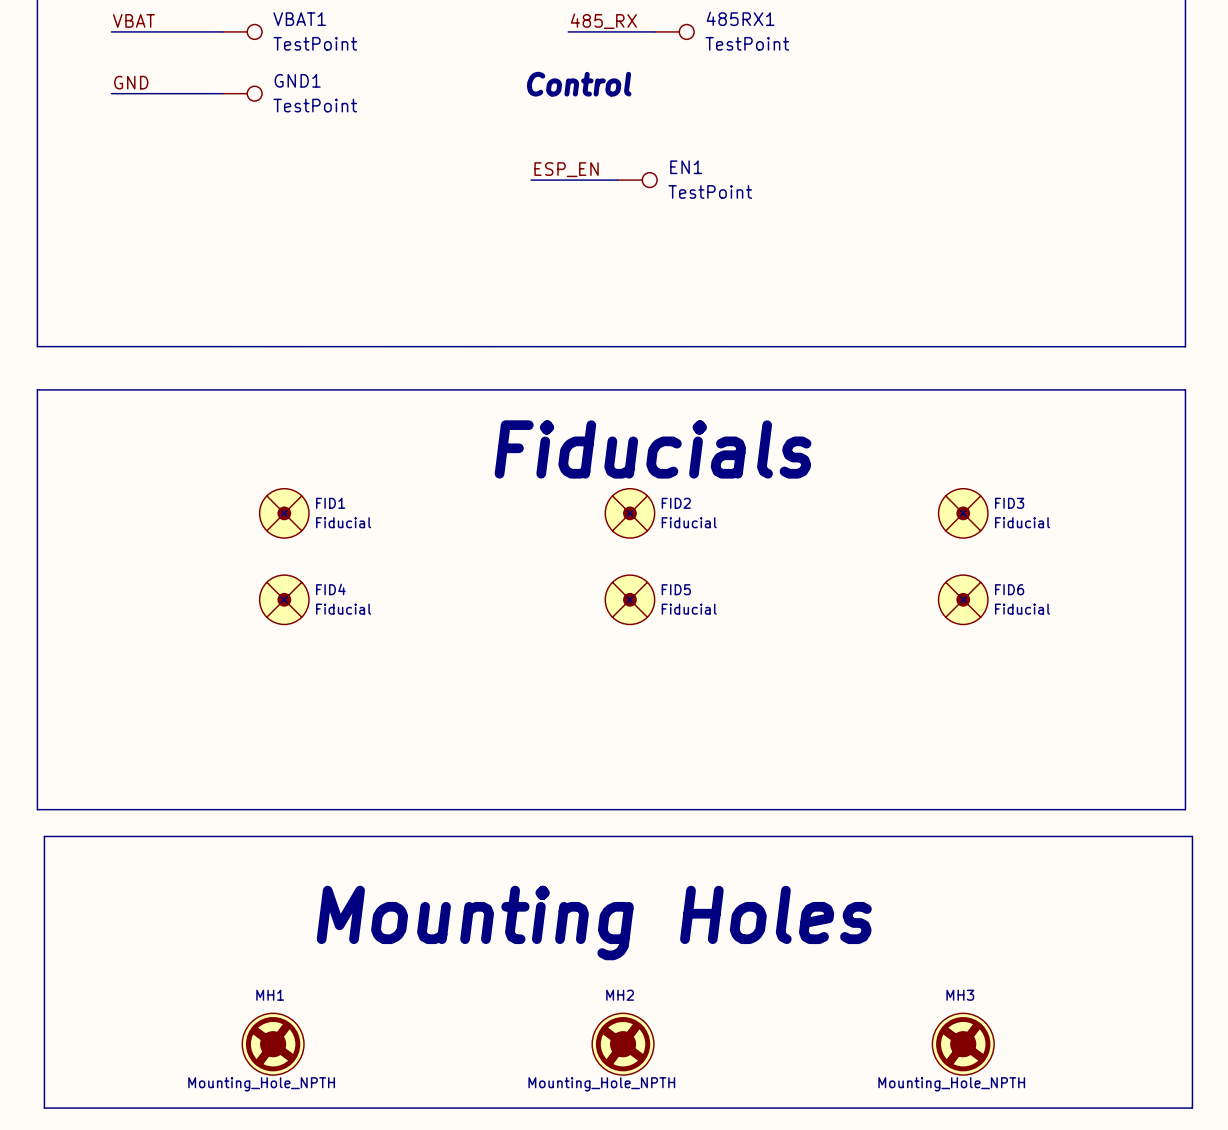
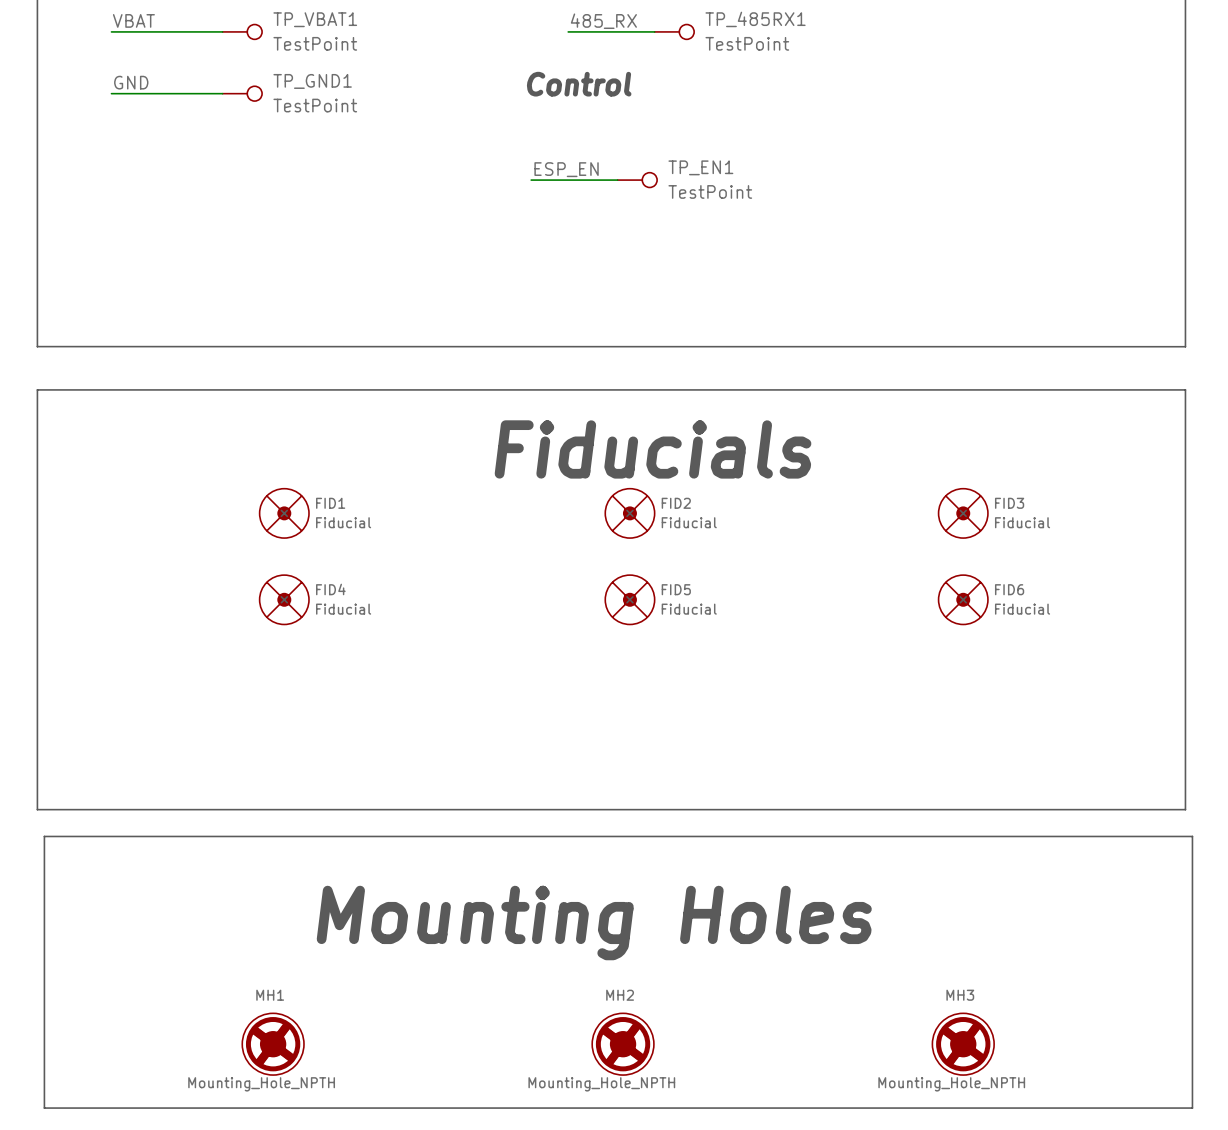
485RX1 name: 485RX1 (740, 18) -> TP_485RX1 (755, 19)
VBAT1 name: VBAT1 (299, 19) -> TP_VBAT1 (315, 19)
GND1 name: GND1 (297, 80) -> TP_GND1 (312, 81)
EN1 name: EN1 (686, 167) -> TP_EN1 (700, 167)

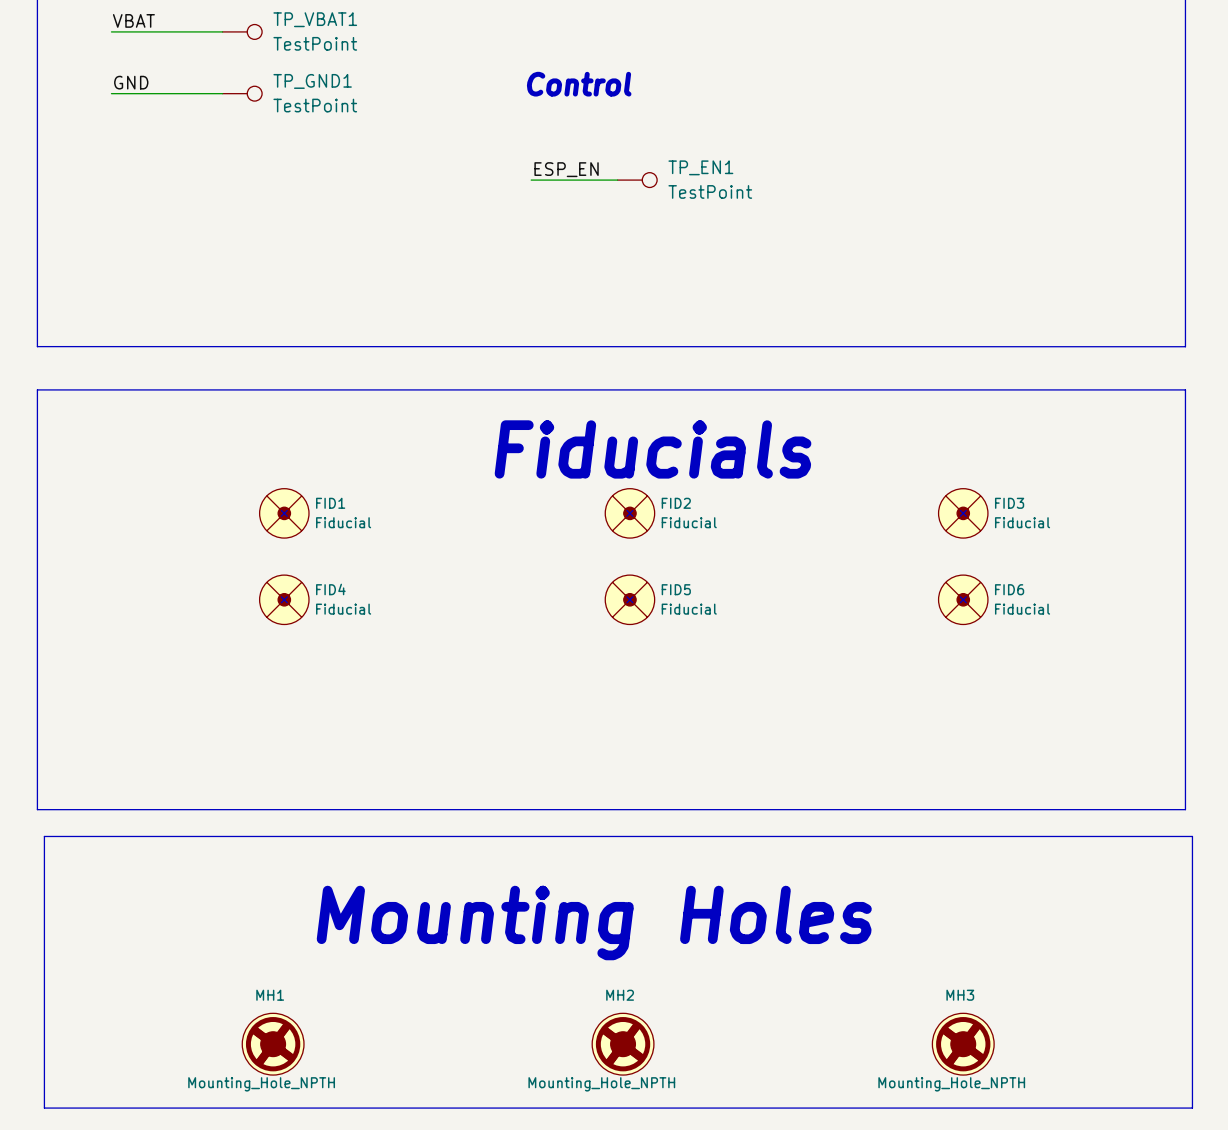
label: 485_RX (603, 21) -> none
wire: (568, 31) (654, 31) -> none
TP_485RX1: TestPoint (674, 31) -> none

